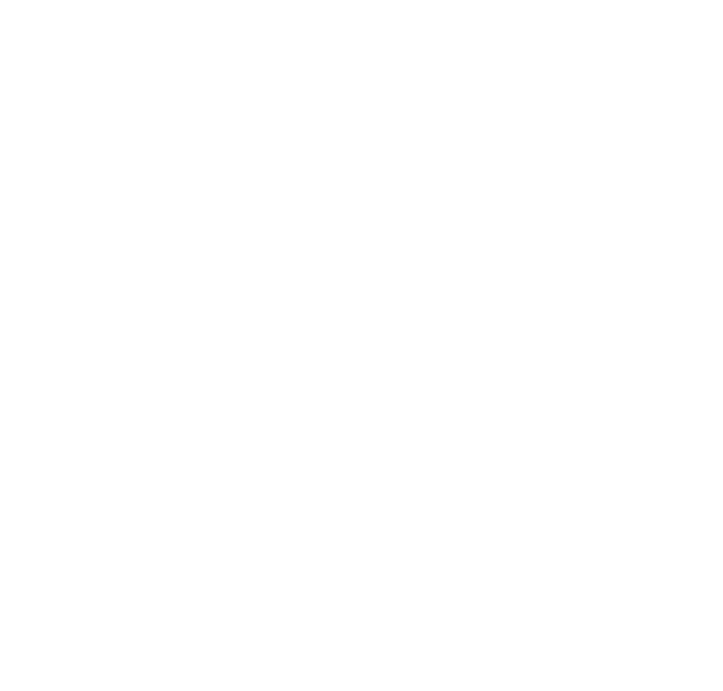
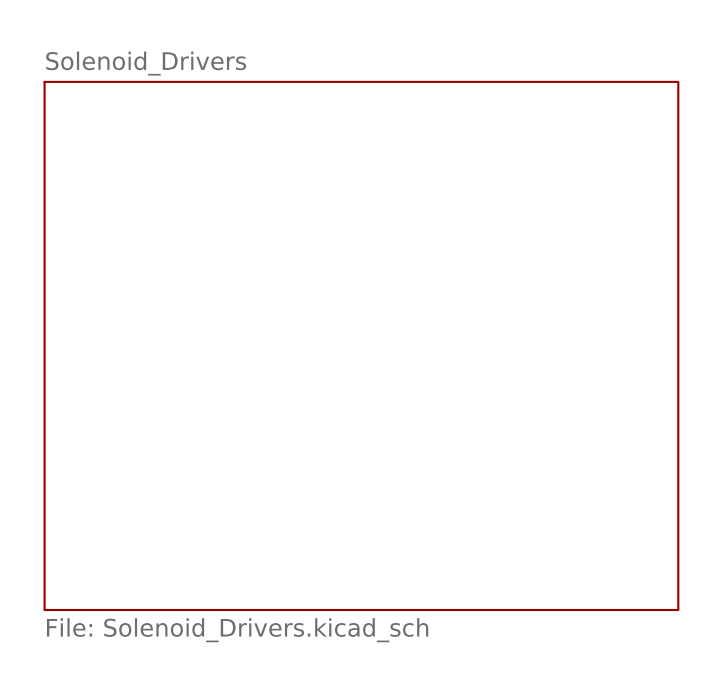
sheet Solenoid_Drivers: none -> File: Solenoid_Drivers.kicad_sch (361, 345)

